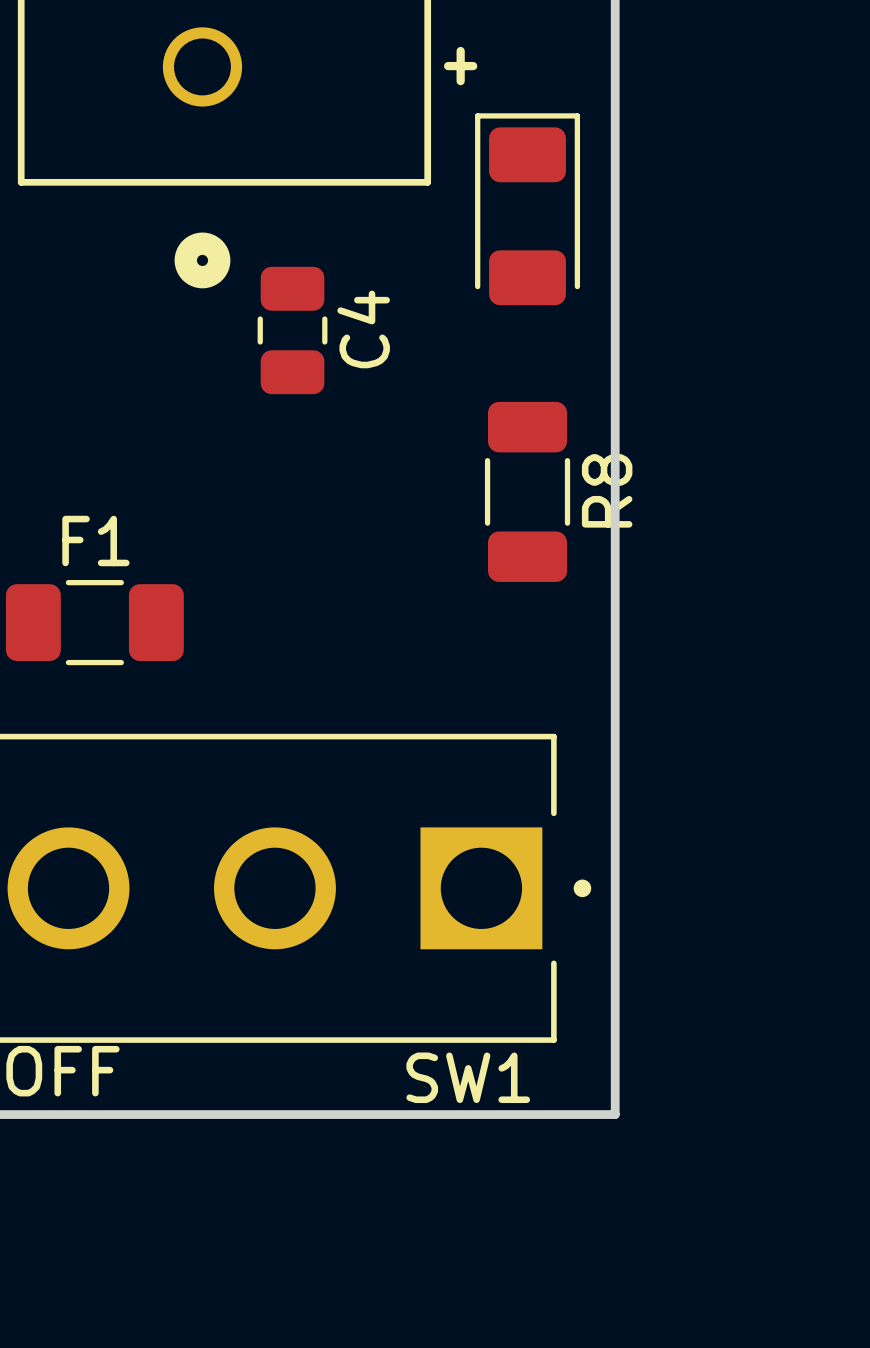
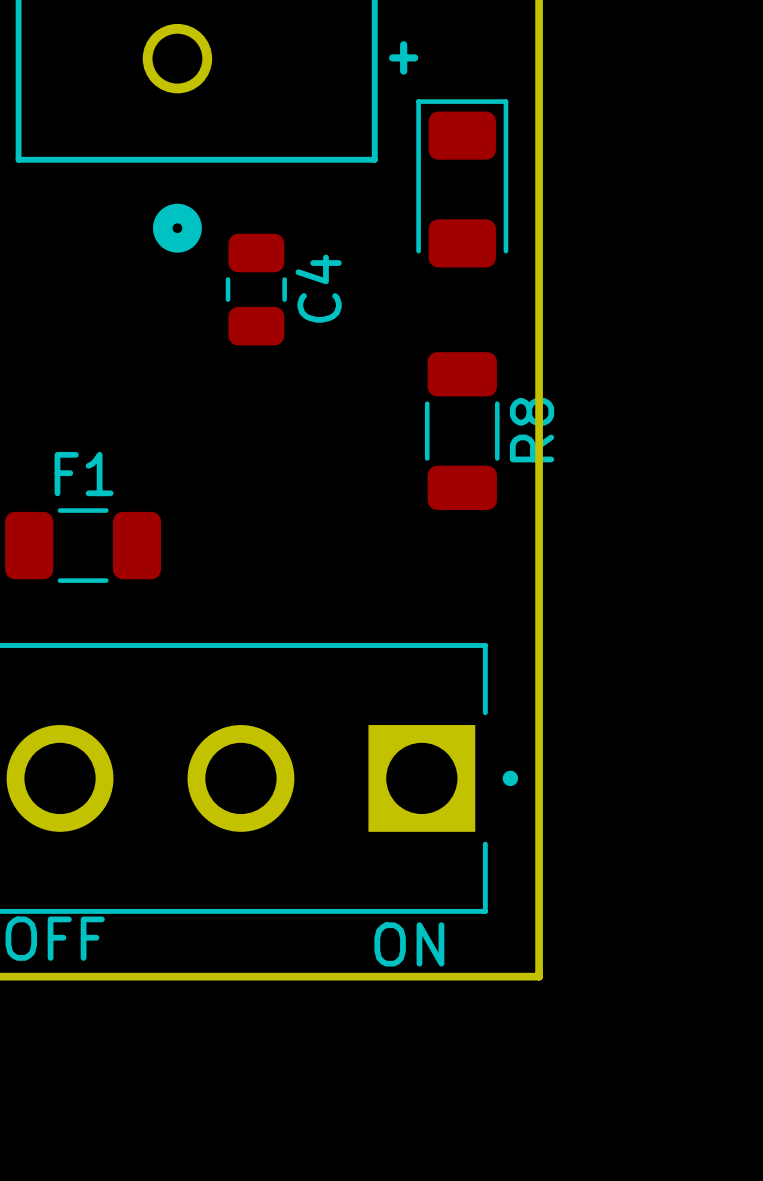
SW1 name: SW1 (468, 1077) -> ON (409, 944)

